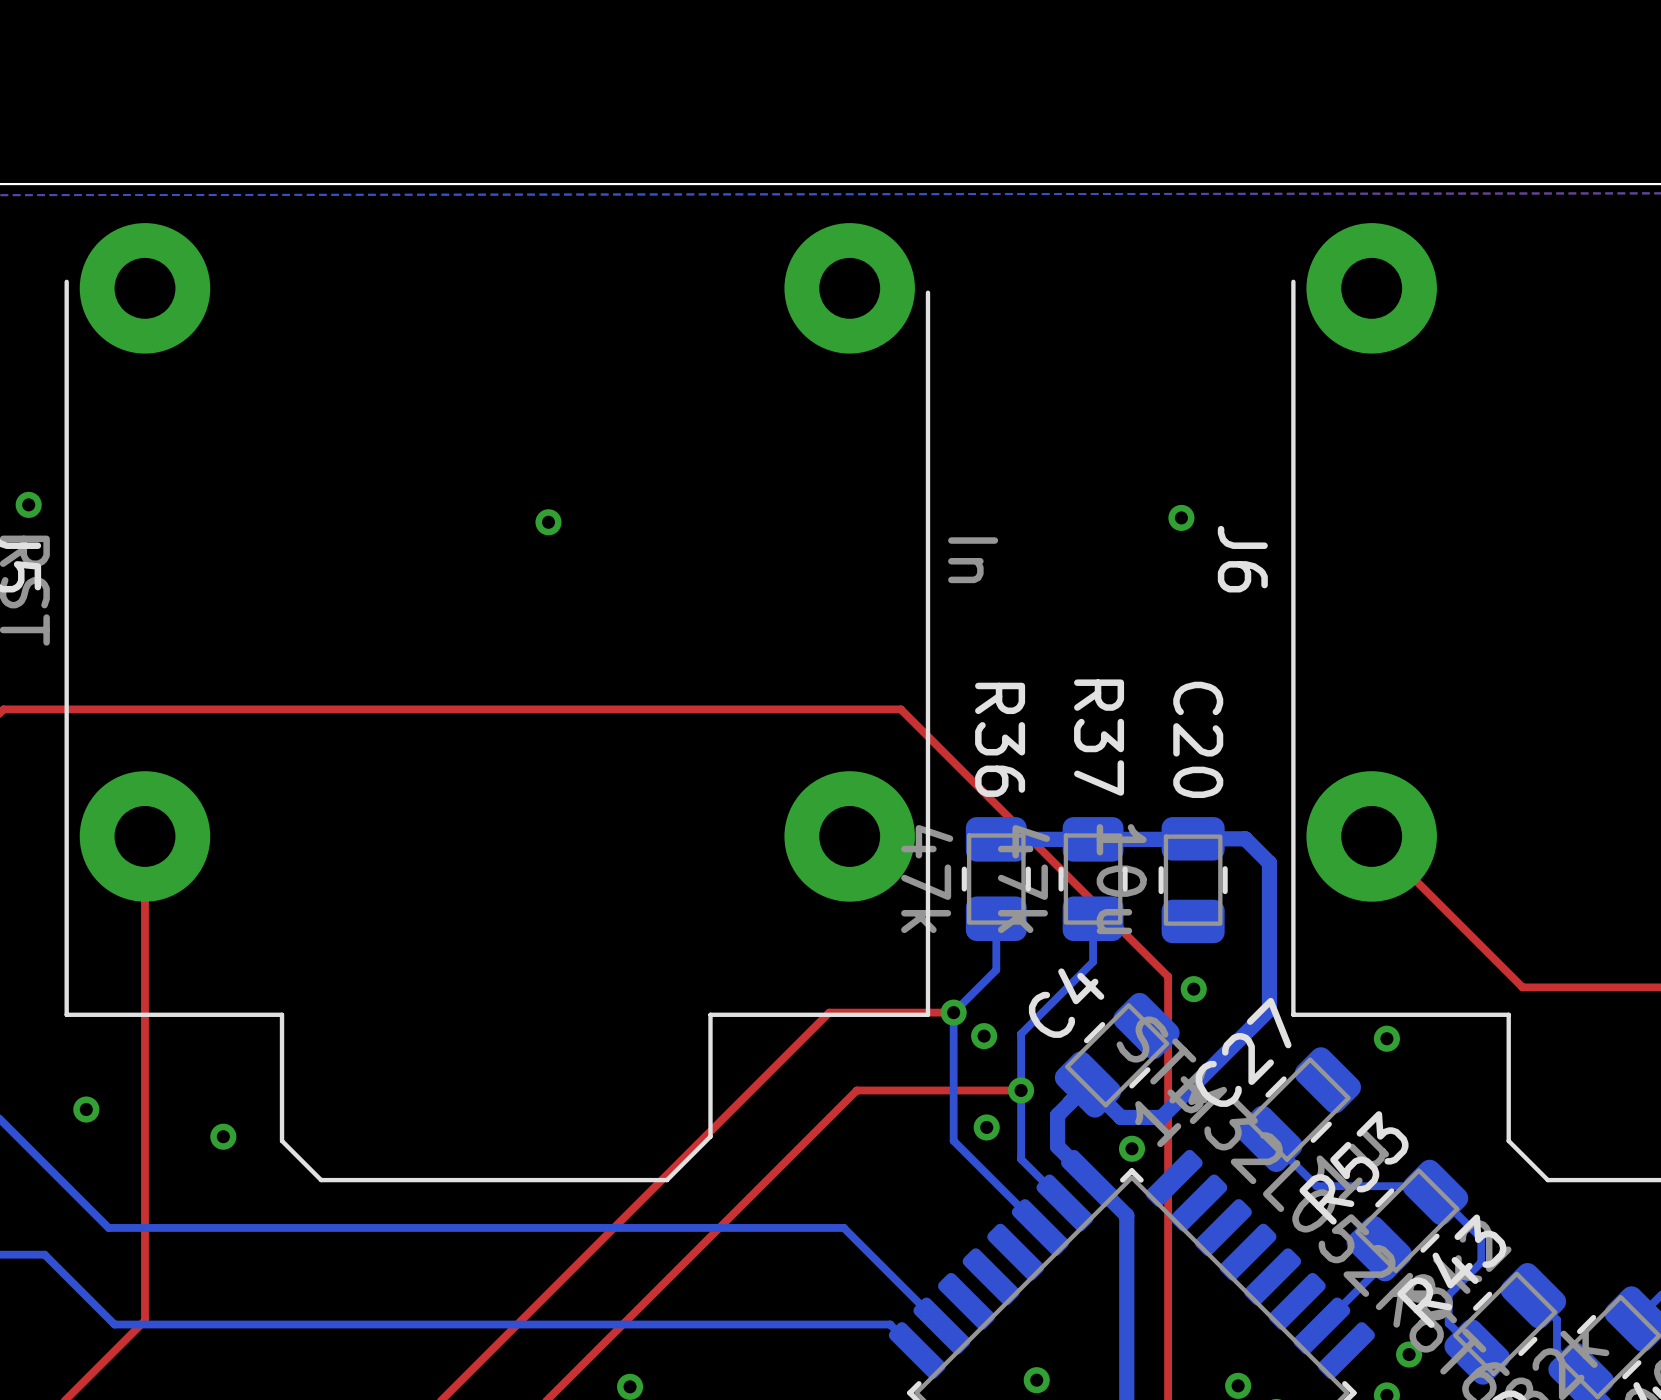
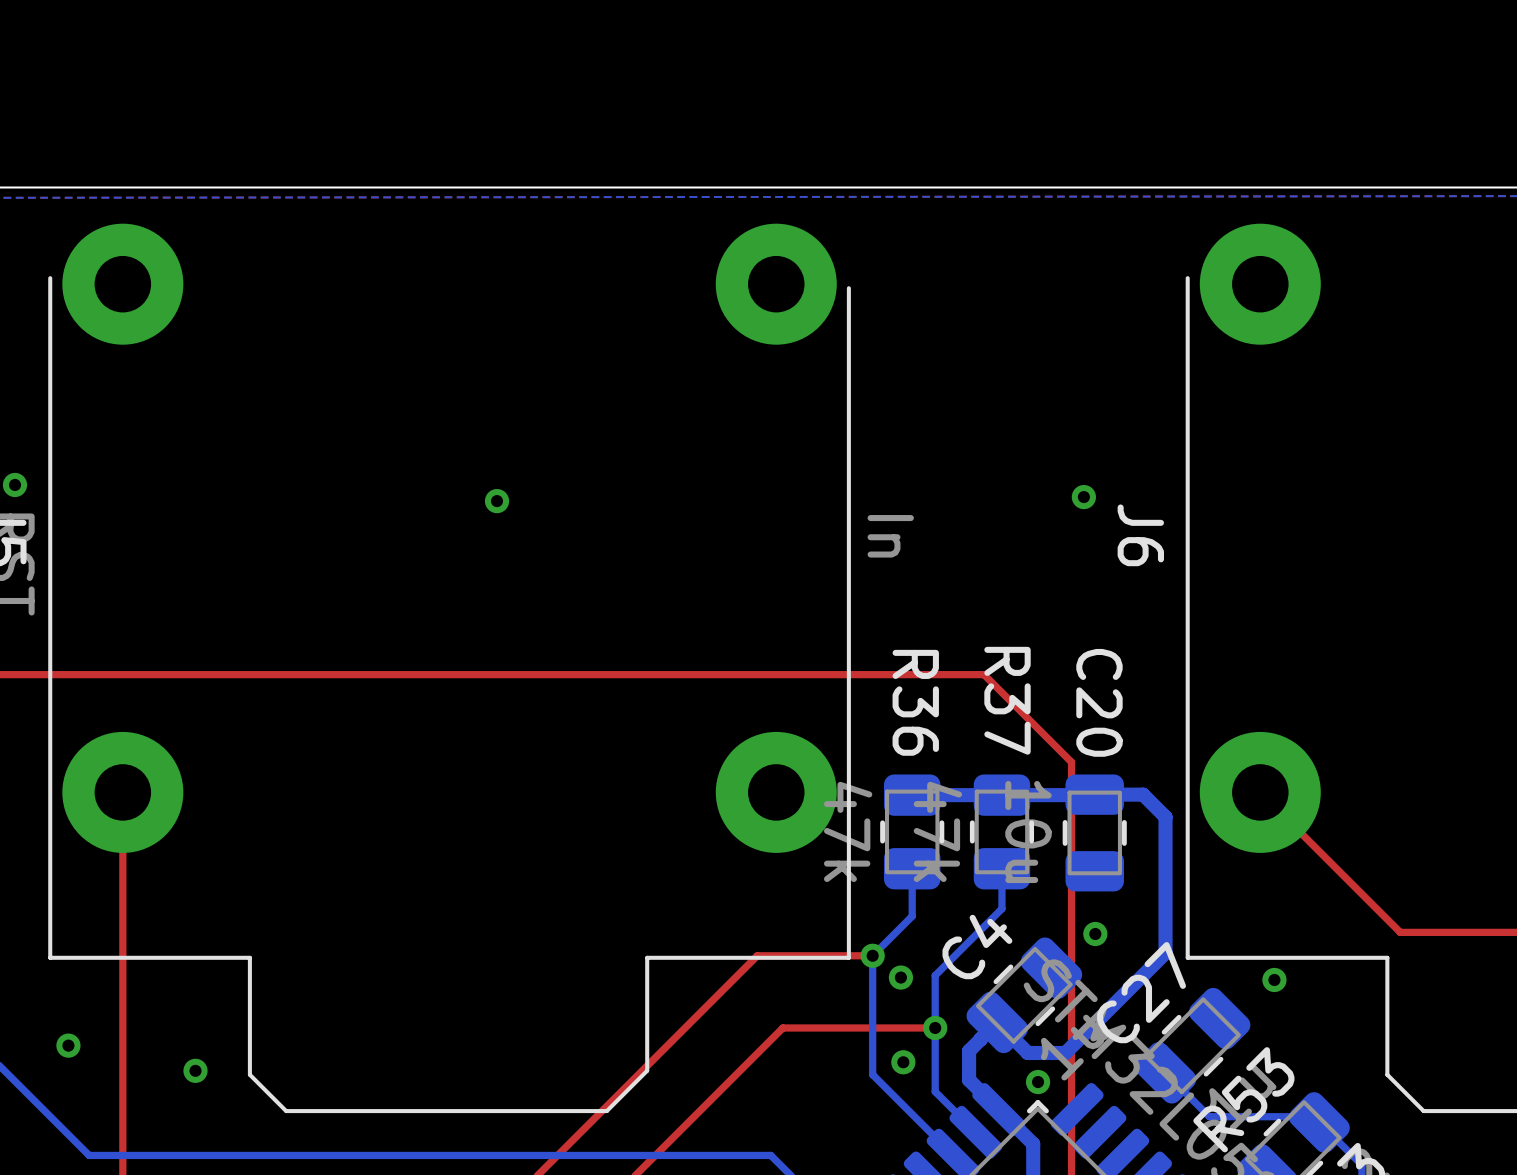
top track: (900, 709) (1168, 976) -> (823, 674) (984, 674) (1071, 762) (1071, 922)

